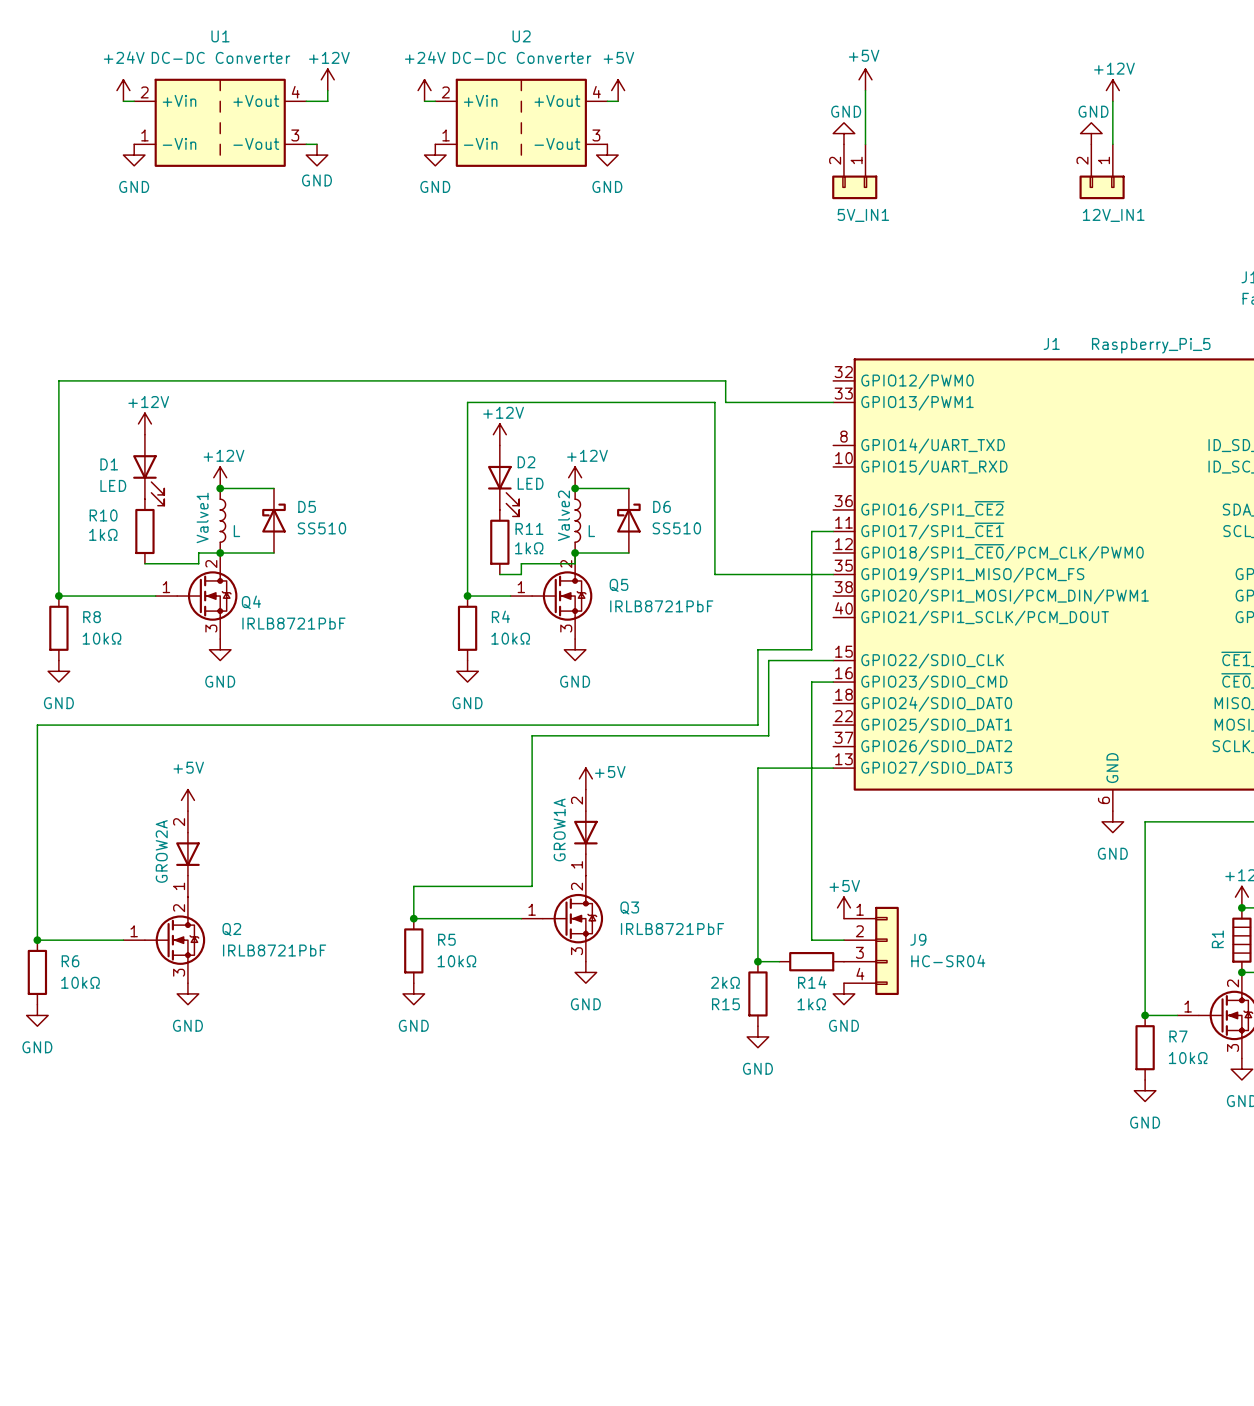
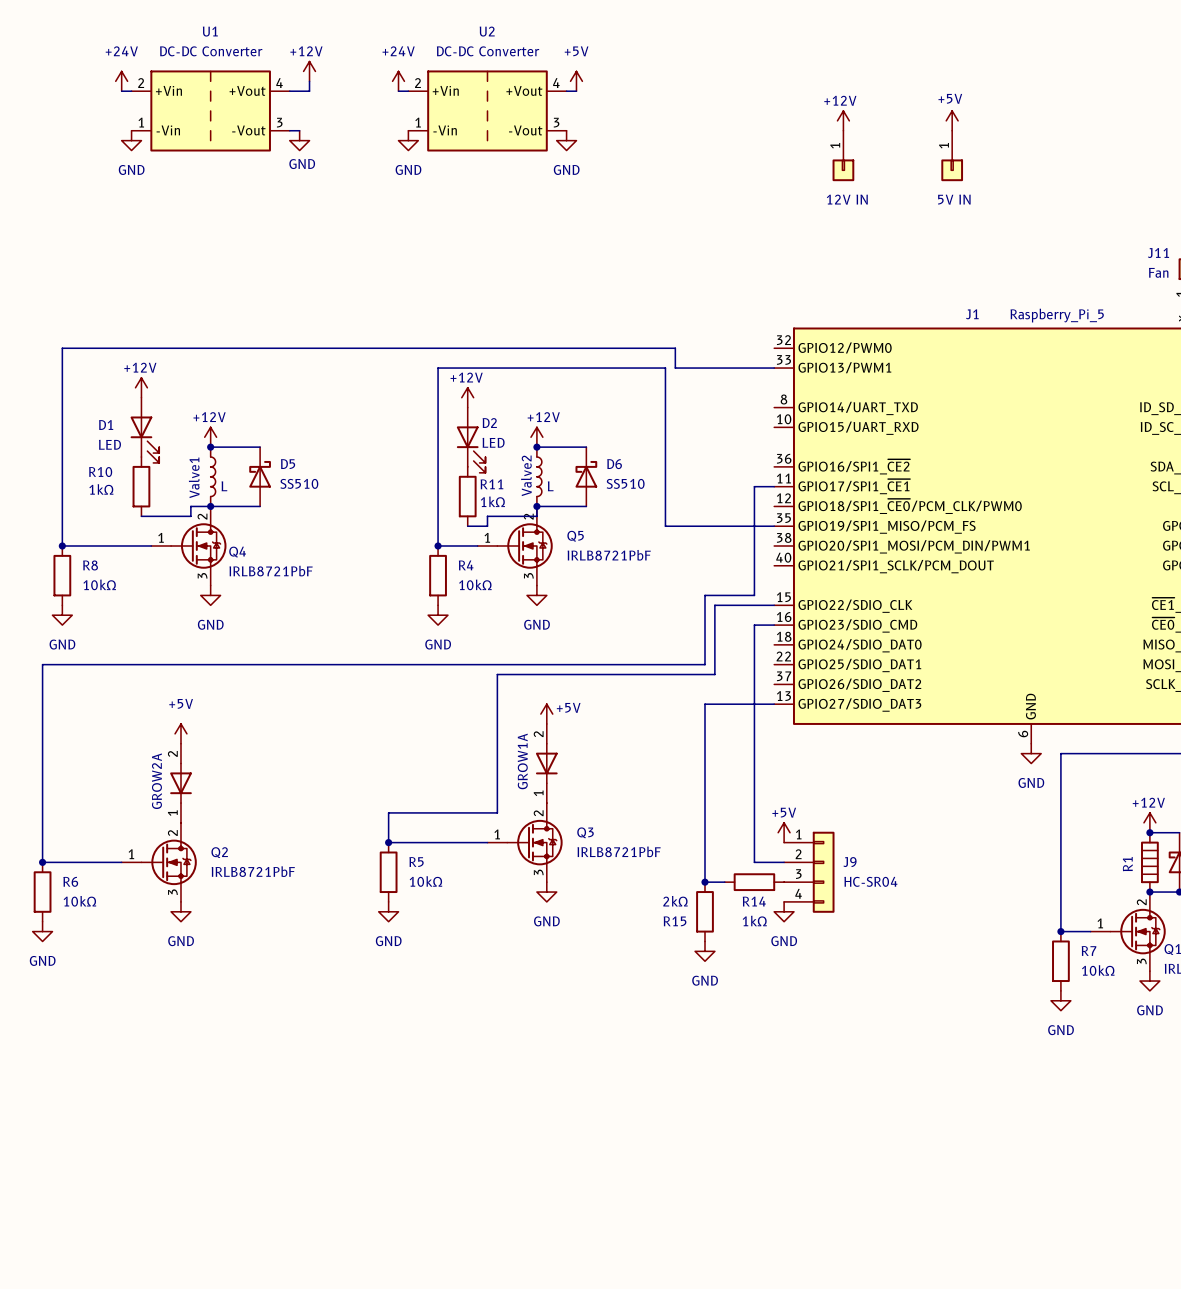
power symbol position: +5V (865, 79) -> +5V (952, 120)
wire: (865, 90) (865, 144) -> none
power symbol position: +12V (1112, 90) -> +12V (843, 120)
wire: (1112, 101) (1112, 144) -> none
power symbol: GND (843, 133) -> none
power symbol: GND (1091, 133) -> none
5V_IN1: (854, 171) -> none
part: none -> 12V IN (843, 155)
part: none -> 5V IN (952, 155)
12V_IN1: (1102, 171) -> none

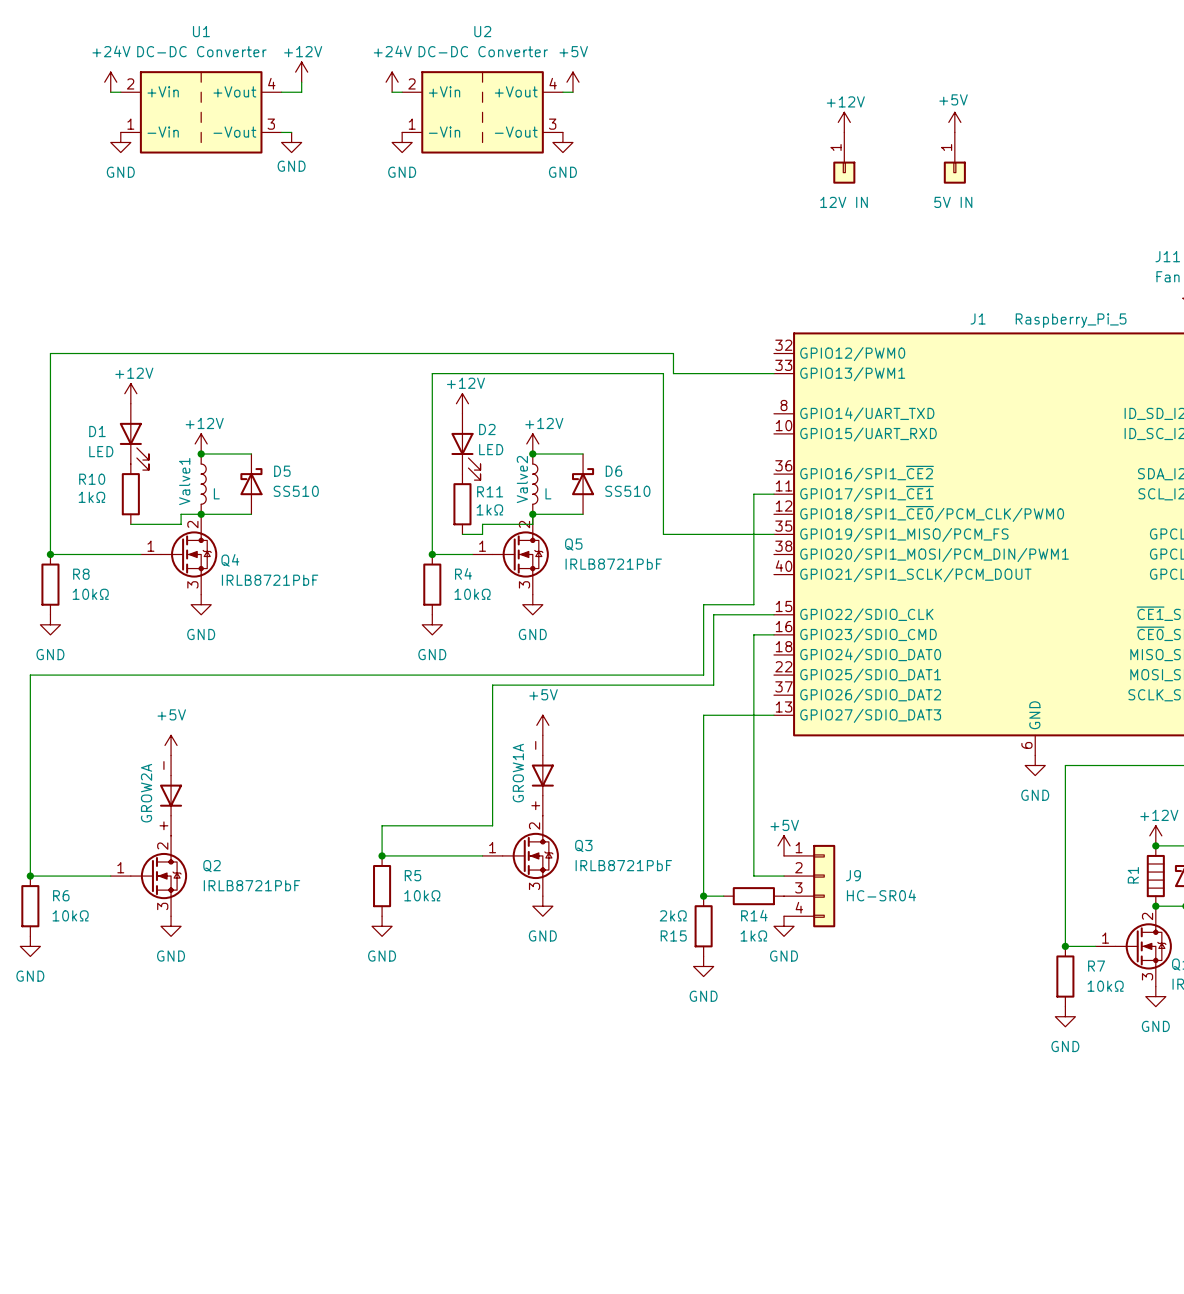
power symbol text position: +5V (568, 707) -> +5V (543, 694)
GROW1A pin number: 2 (538, 734) -> - (535, 745)
GROW2A pin number: 2 (172, 753) -> - (163, 765)
GROW1A pin number: 1 (538, 793) -> + (535, 805)
GROW2A pin number: 1 (172, 813) -> + (163, 825)

